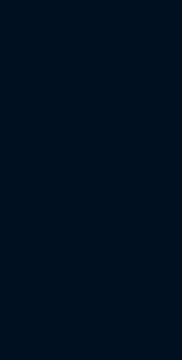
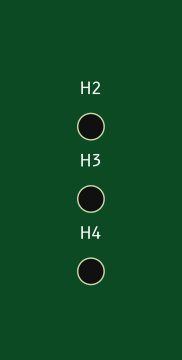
H2: none -> (90, 126)
H3: none -> (90, 198)
H4: none -> (90, 271)

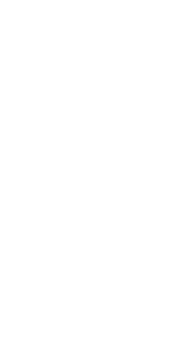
H2: (90, 126) -> none
H3: (90, 198) -> none
H4: (90, 271) -> none

